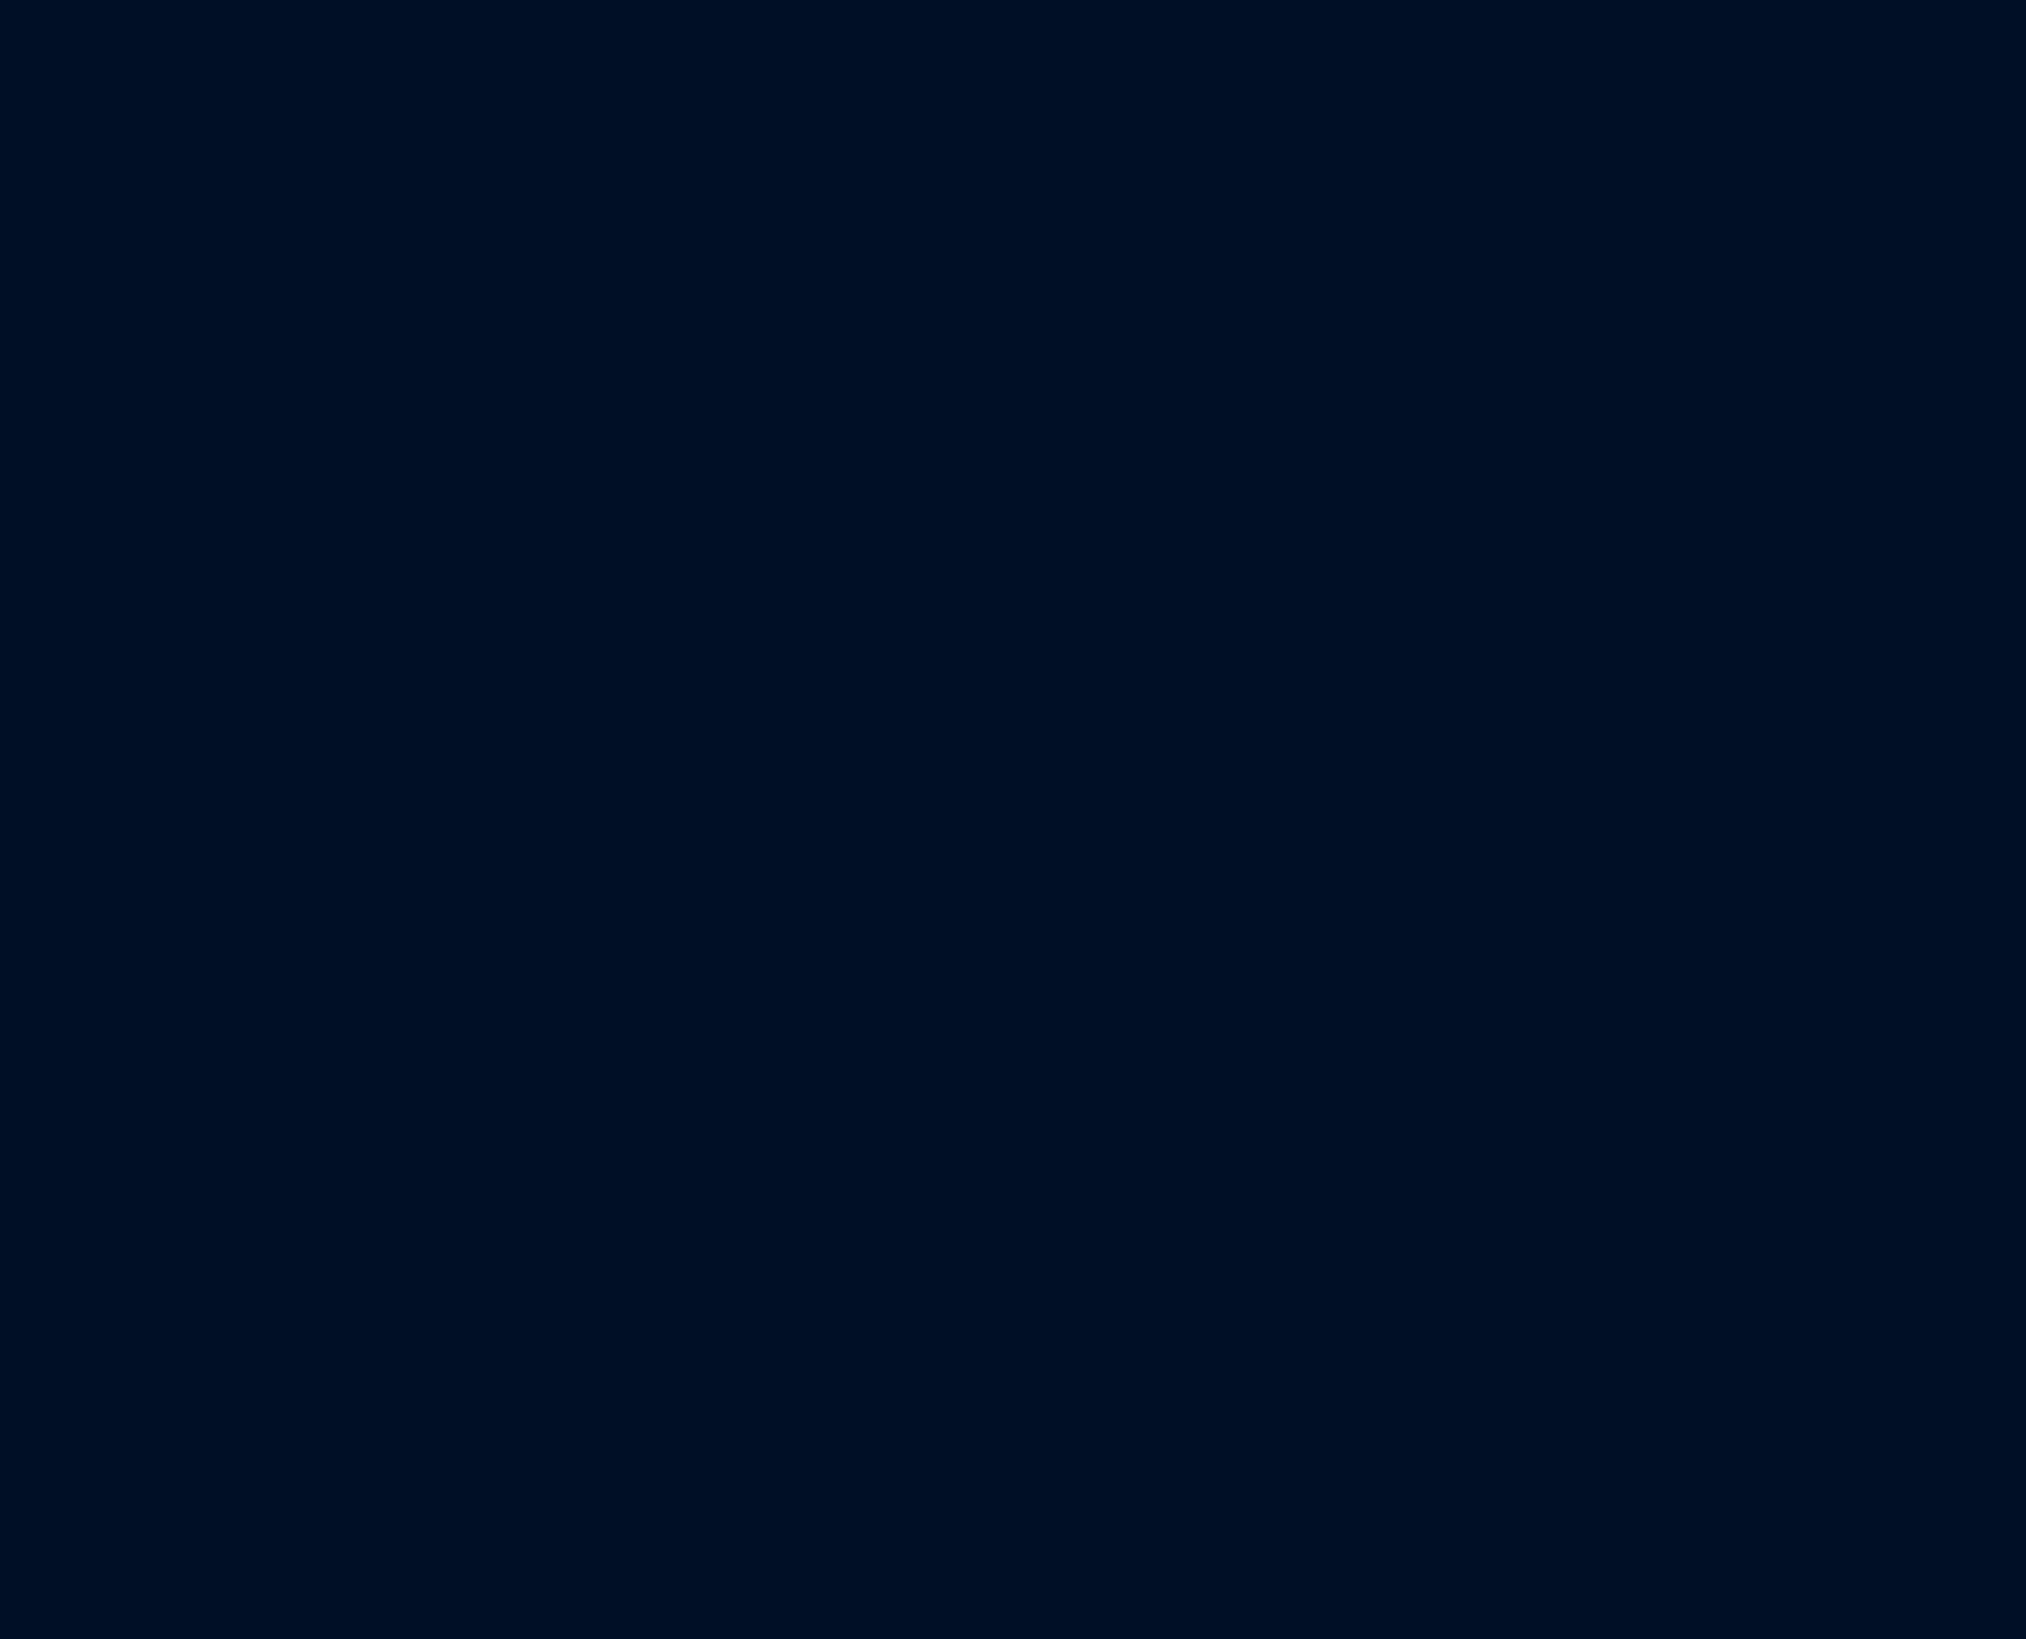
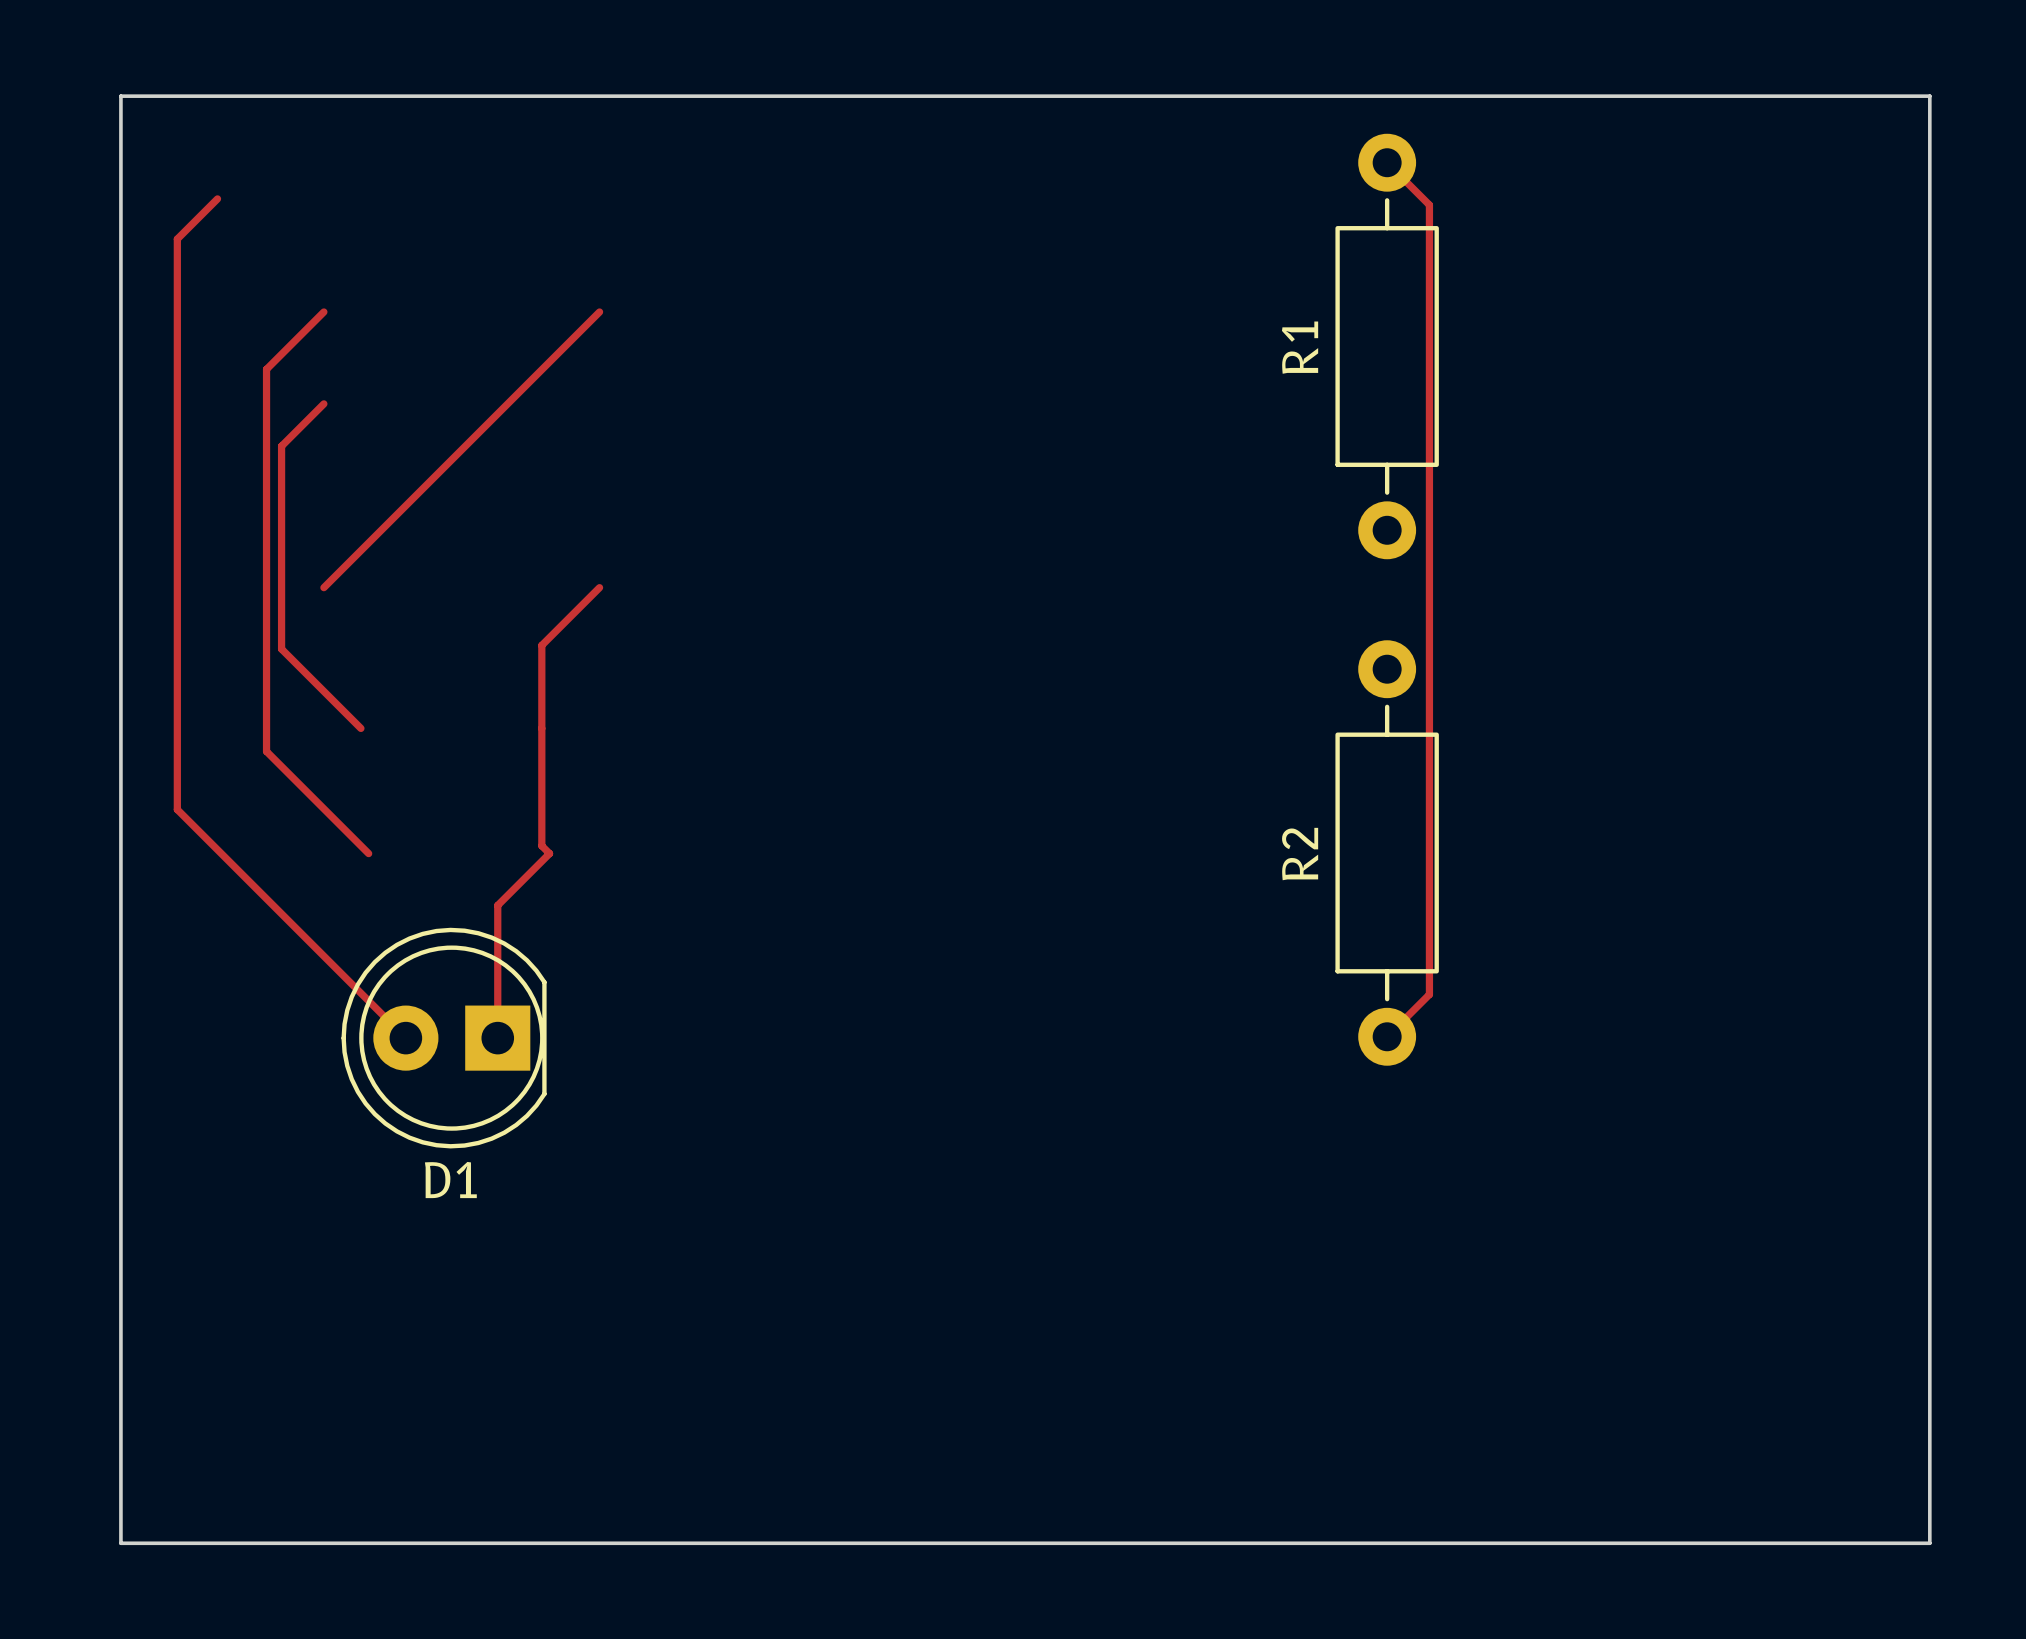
board edge: none -> (120, 96) (1929, 96) (1929, 1543) (120, 1543) (120, 96)
track: none -> (1387, 162) (1429, 205) (1429, 994) (1387, 1036)
track: none -> (217, 198) (177, 239) (177, 809) (405, 1038)
track: none -> (323, 311) (266, 369) (266, 751) (368, 853)
track: none -> (599, 311) (323, 587)
R1: none -> (1387, 346)
track: none -> (323, 403) (281, 446) (281, 649) (360, 728)
track: none -> (599, 587) (541, 645) (541, 845) (549, 853) (497, 905) (497, 1038)
R2: none -> (1387, 852)
D1: none -> (444, 1038)

